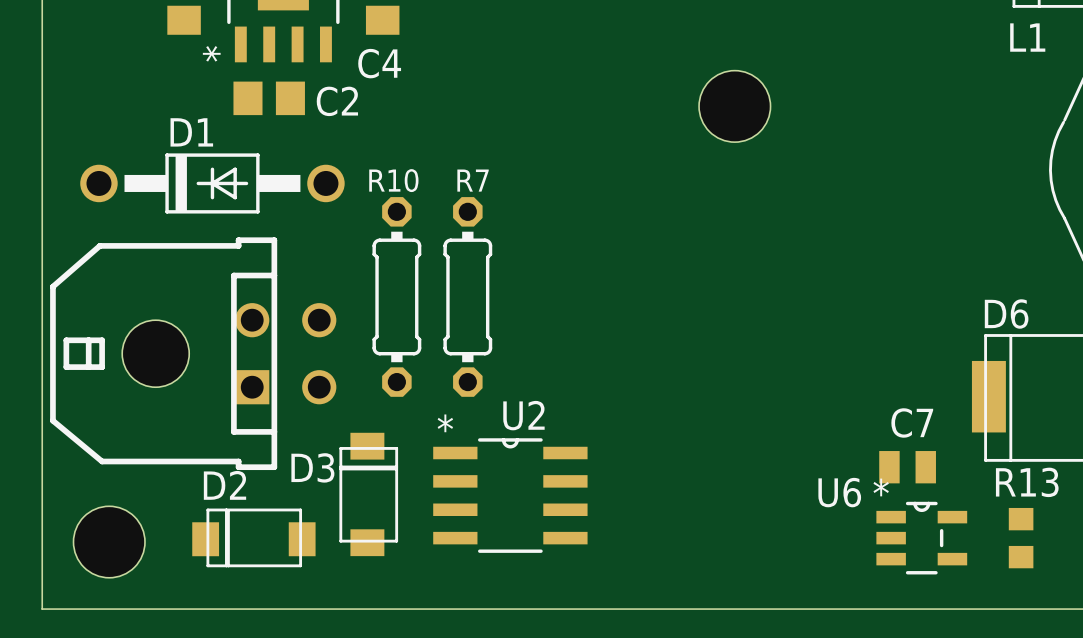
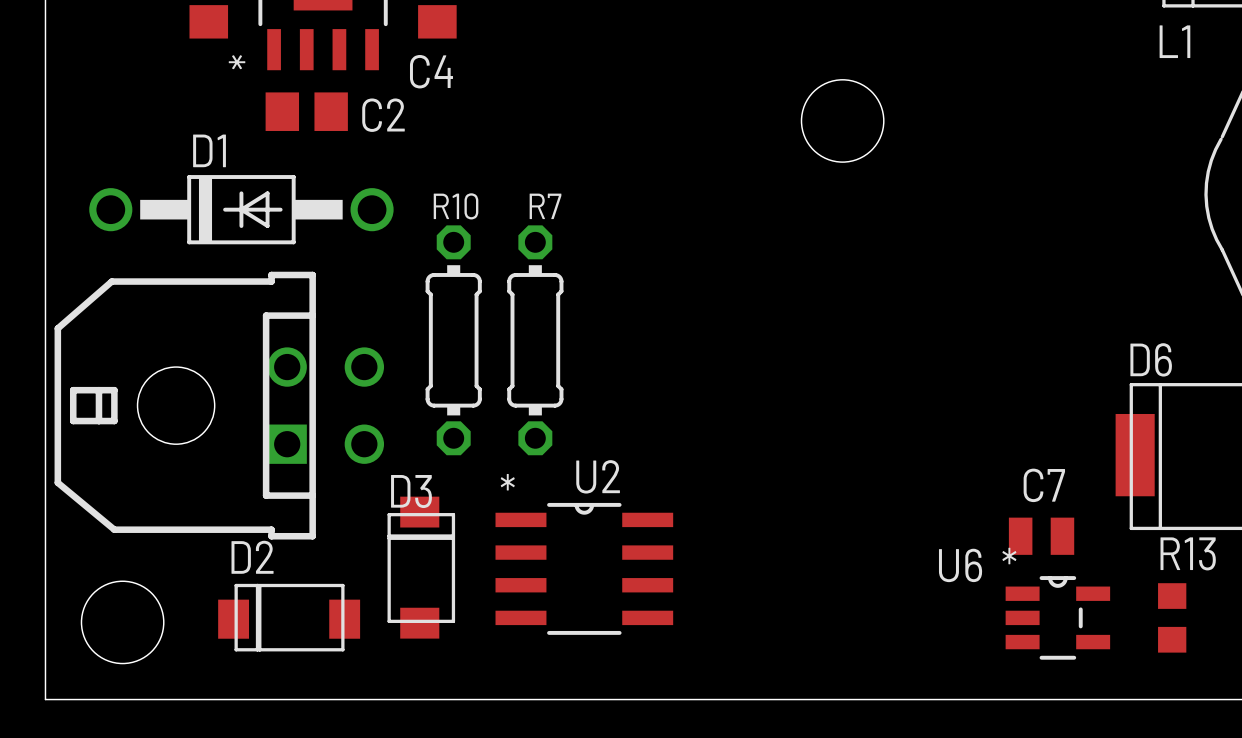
D3 name position: D3 (312, 467) -> D3 (411, 491)

